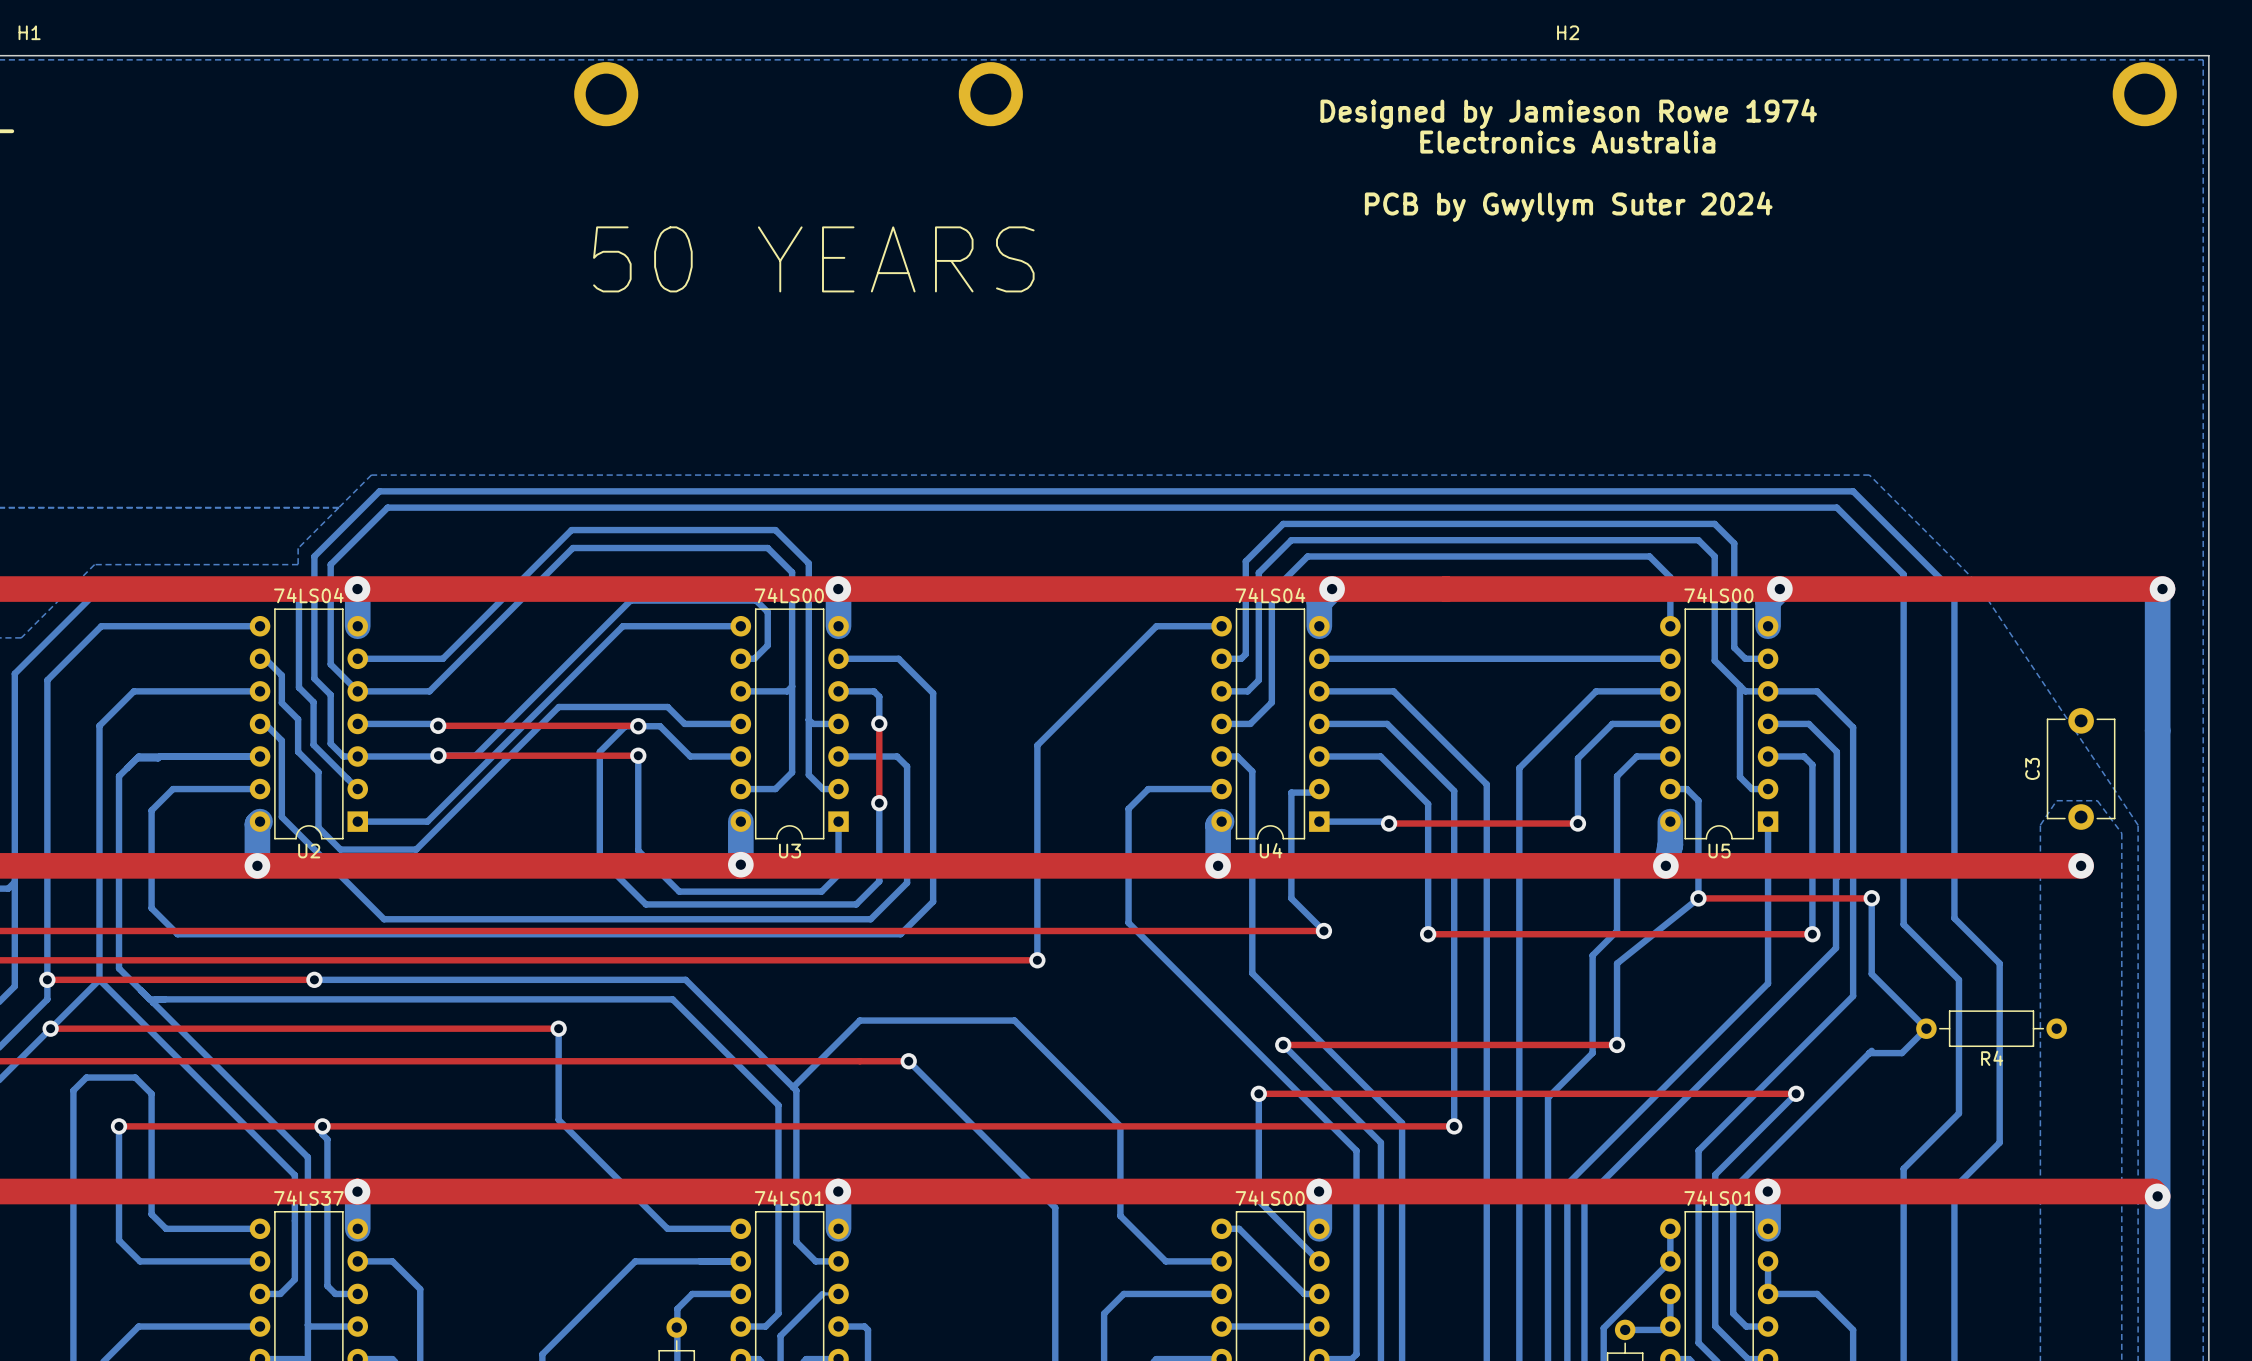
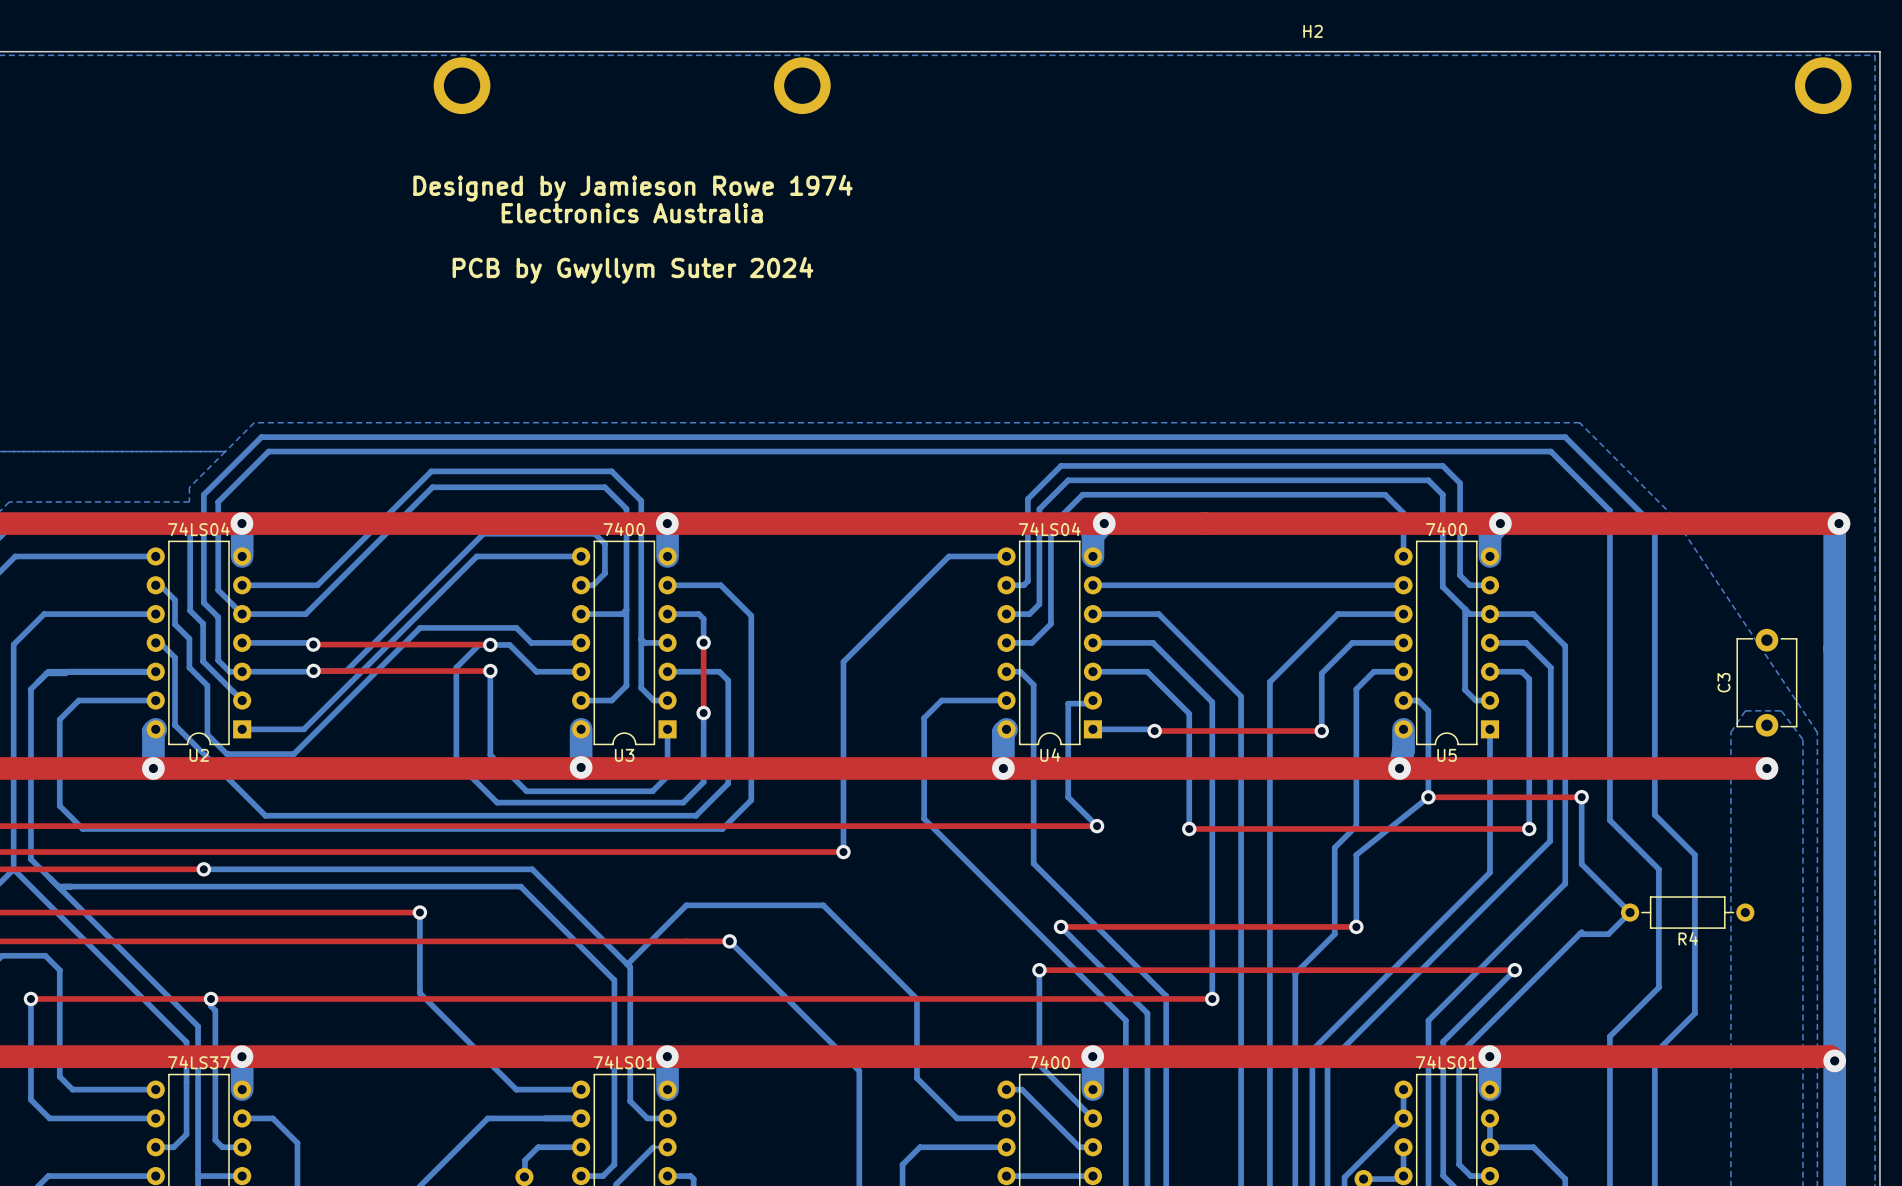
text: Designed by Jamieson Rowe 1974 (1568, 113) -> none
text: Electronics Australia (1567, 142) -> none
text: PCB by Gwyllym Suter 2024 (1568, 206) -> none
text: none -> Designed by Jamieson Rowe 1974 (632, 188)
text: none -> Electronics Australia (632, 213)
text: 50 YEARS (813, 259) -> none
text: none -> PCB by Gwyllym Suter 2024 (632, 270)
U3 value: 74LS00 (789, 595) -> 7400 (624, 529)
U5 value: 74LS00 (1718, 595) -> 7400 (1446, 529)
part value: 74LS00 (1270, 1198) -> 7400 (1049, 1062)

